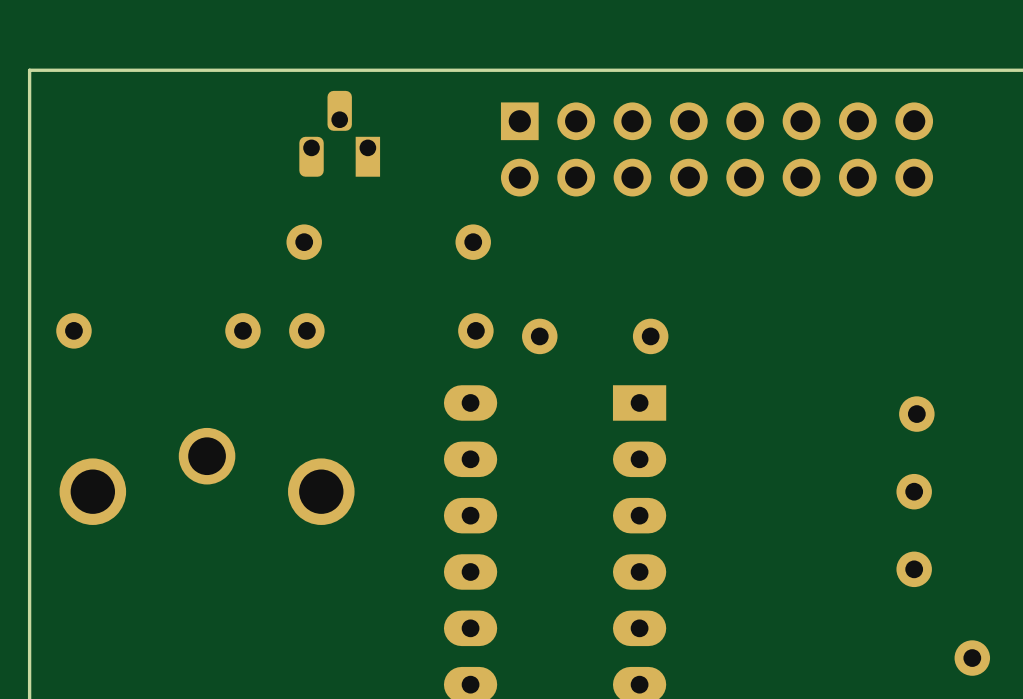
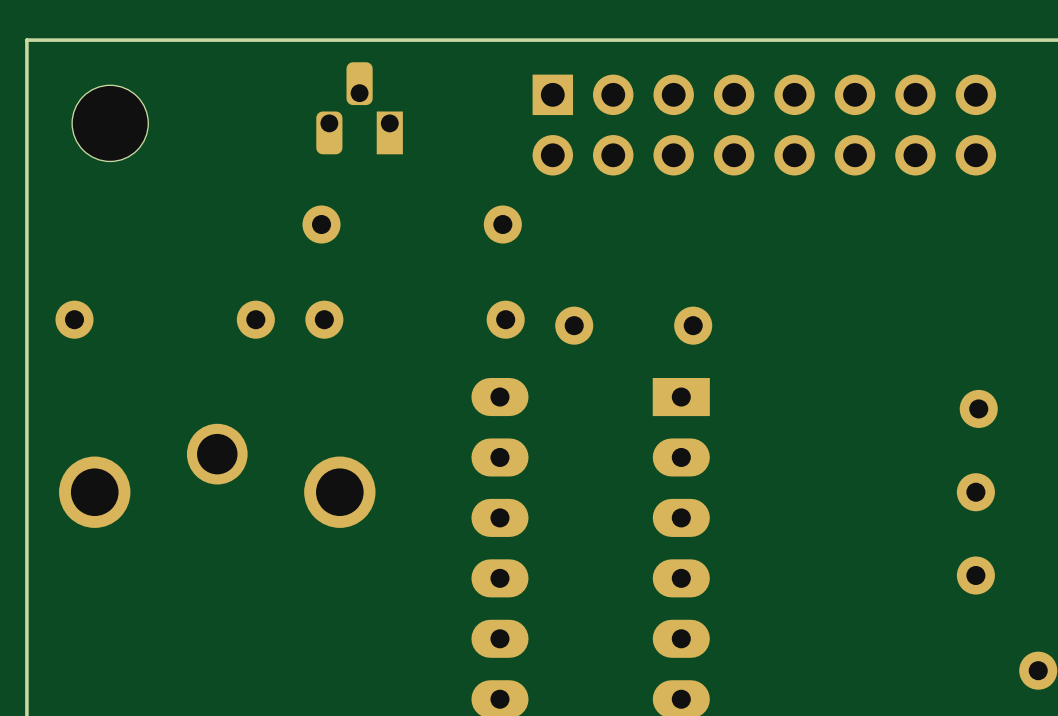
part: none -> (110, 123)

